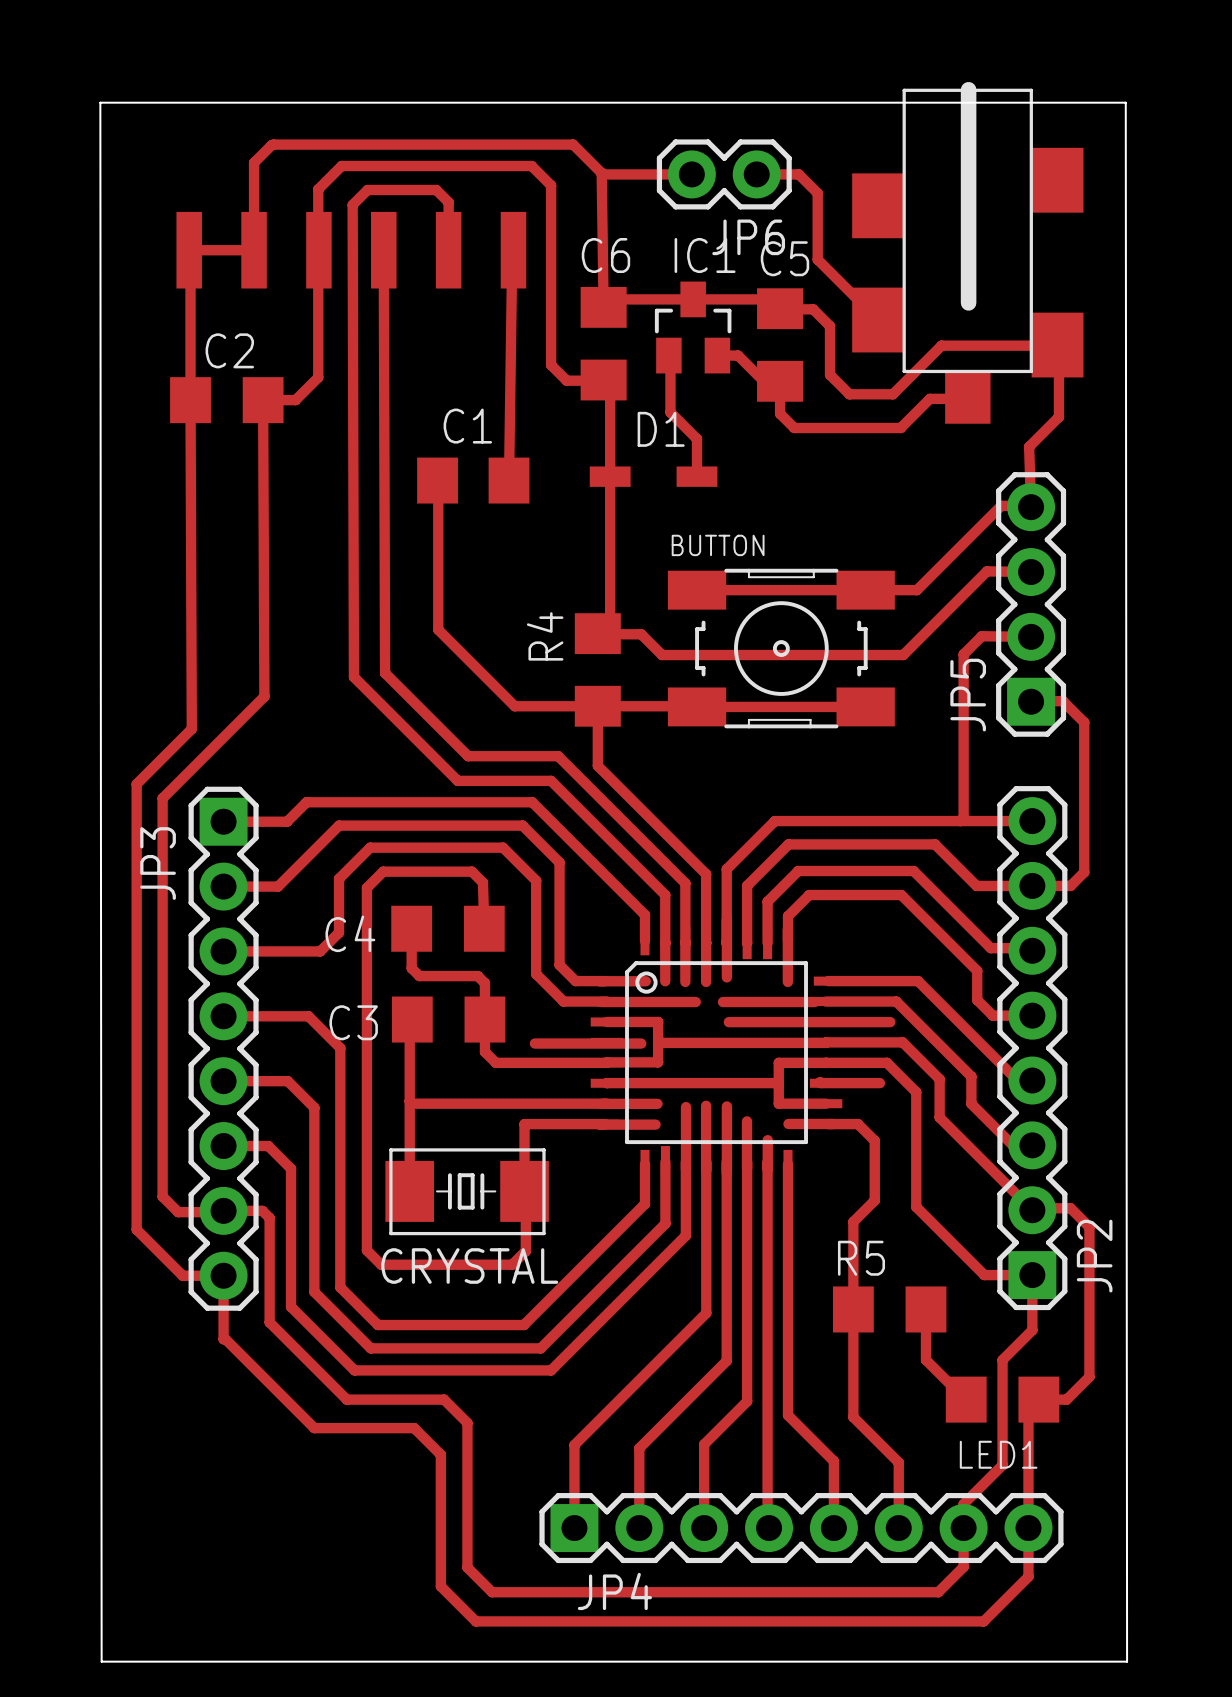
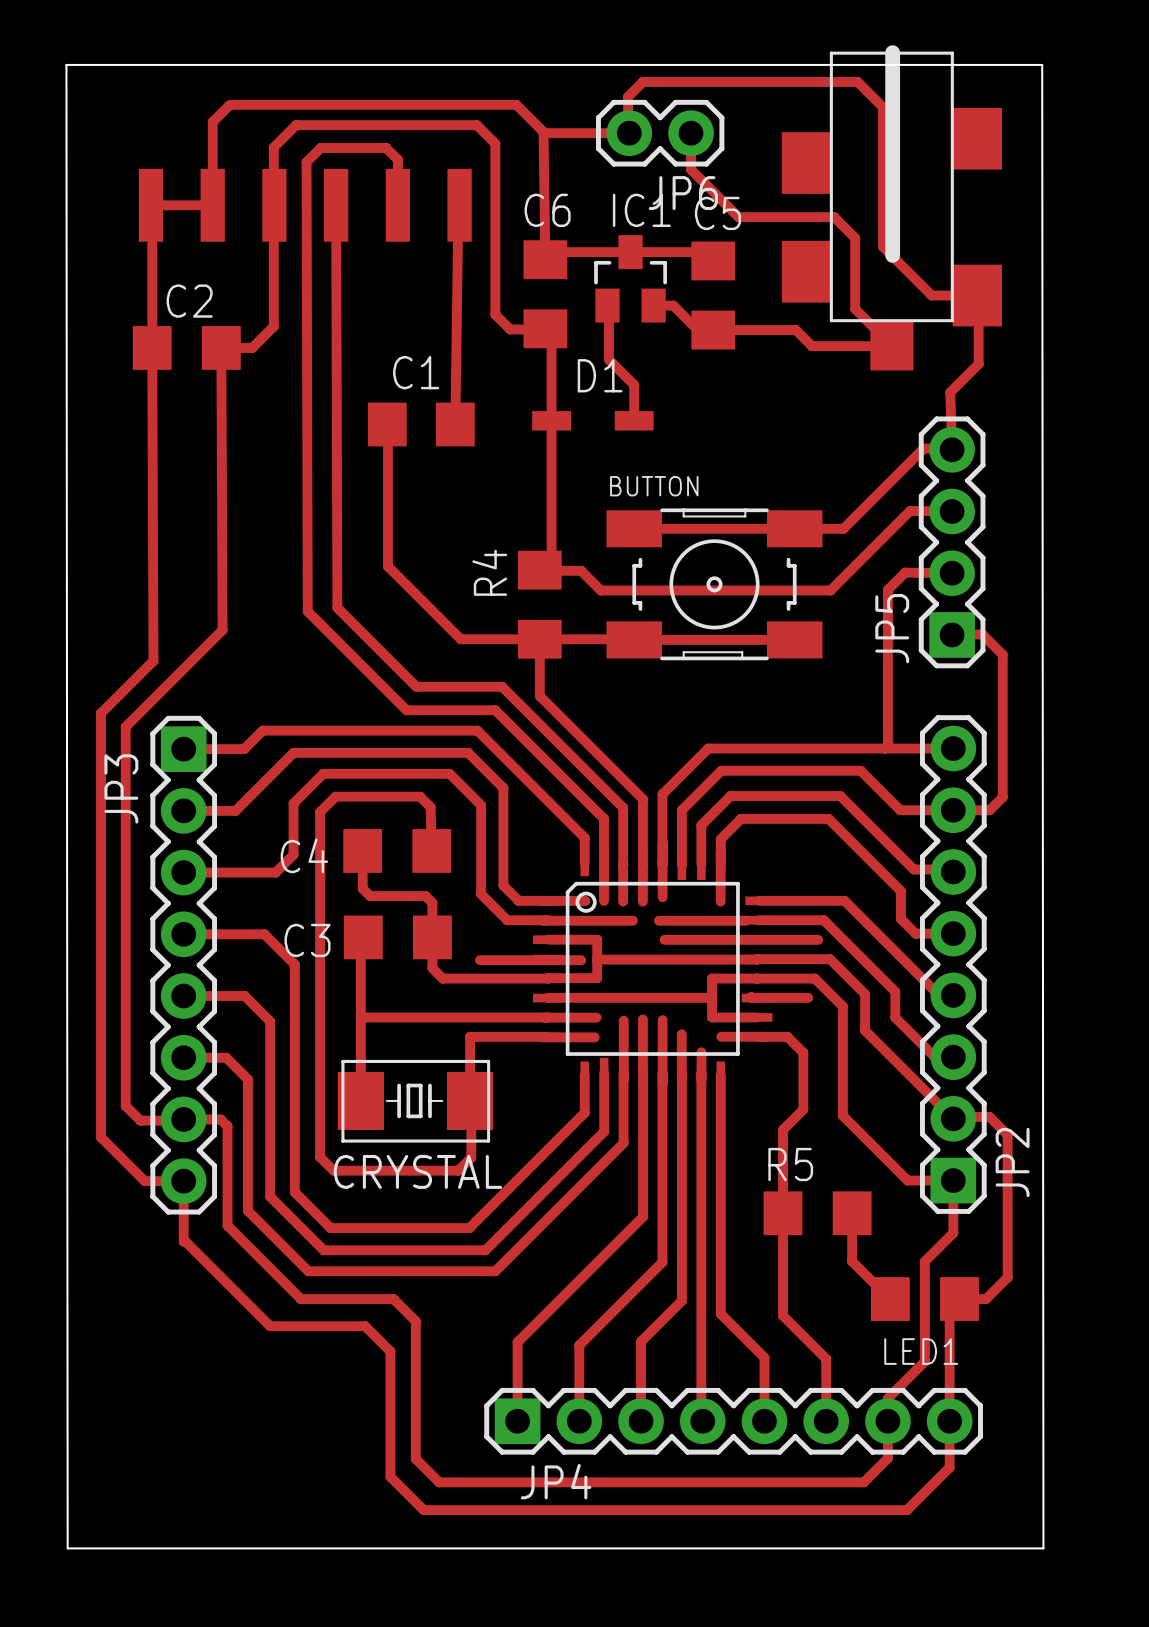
track: (756, 174) (798, 174) (817, 193) (817, 259) (878, 320) -> (691, 133) (691, 169) (738, 217) (834, 217) (855, 238) (855, 309) (891, 345)
track: (765, 299) (775, 309) (813, 309) (830, 326) (830, 374) (849, 394) (892, 394) (941, 345) (1057, 345) -> (629, 133) (628, 96) (642, 81) (857, 81) (882, 107) (882, 246) (931, 295) (977, 295)
track: (780, 381) (780, 413) (794, 428) (900, 428) (929, 398) (966, 398) -> (713, 330) (795, 330) (812, 346) (891, 346)

